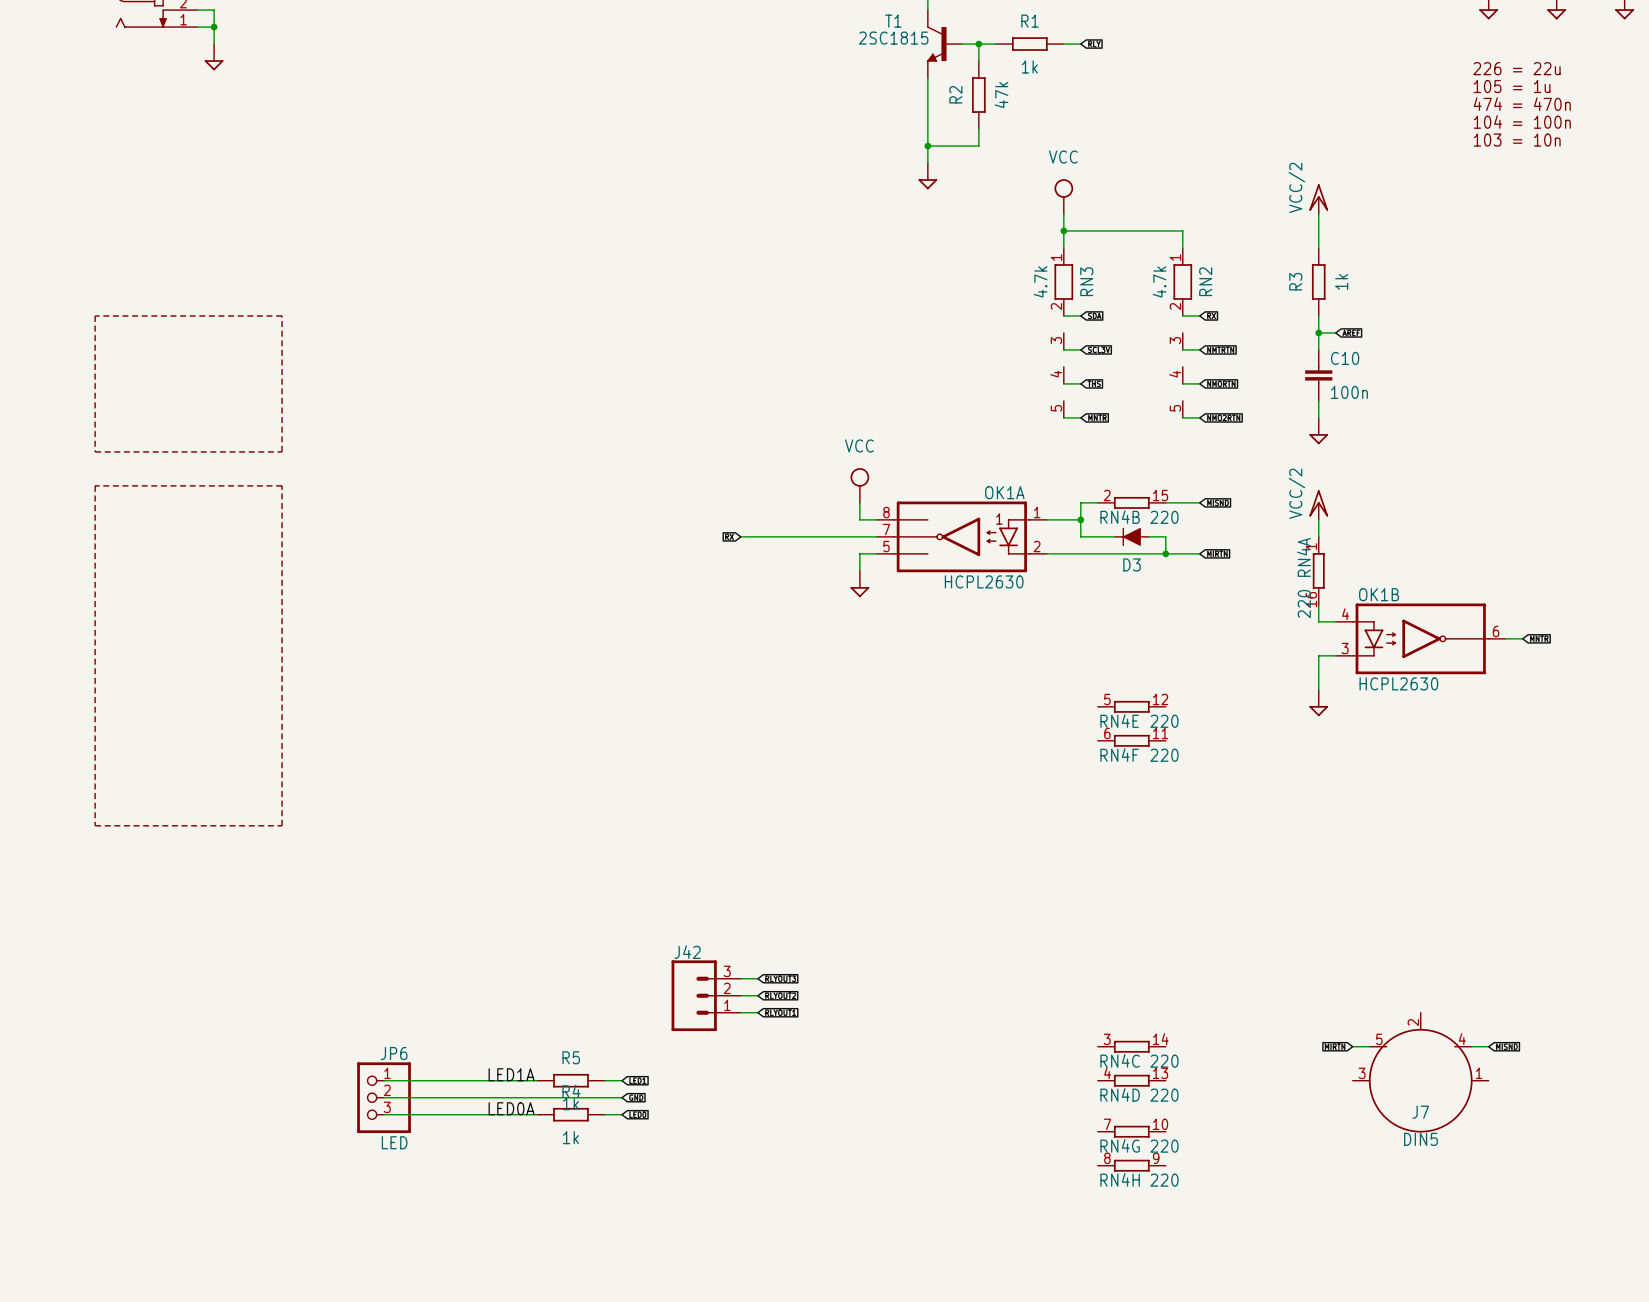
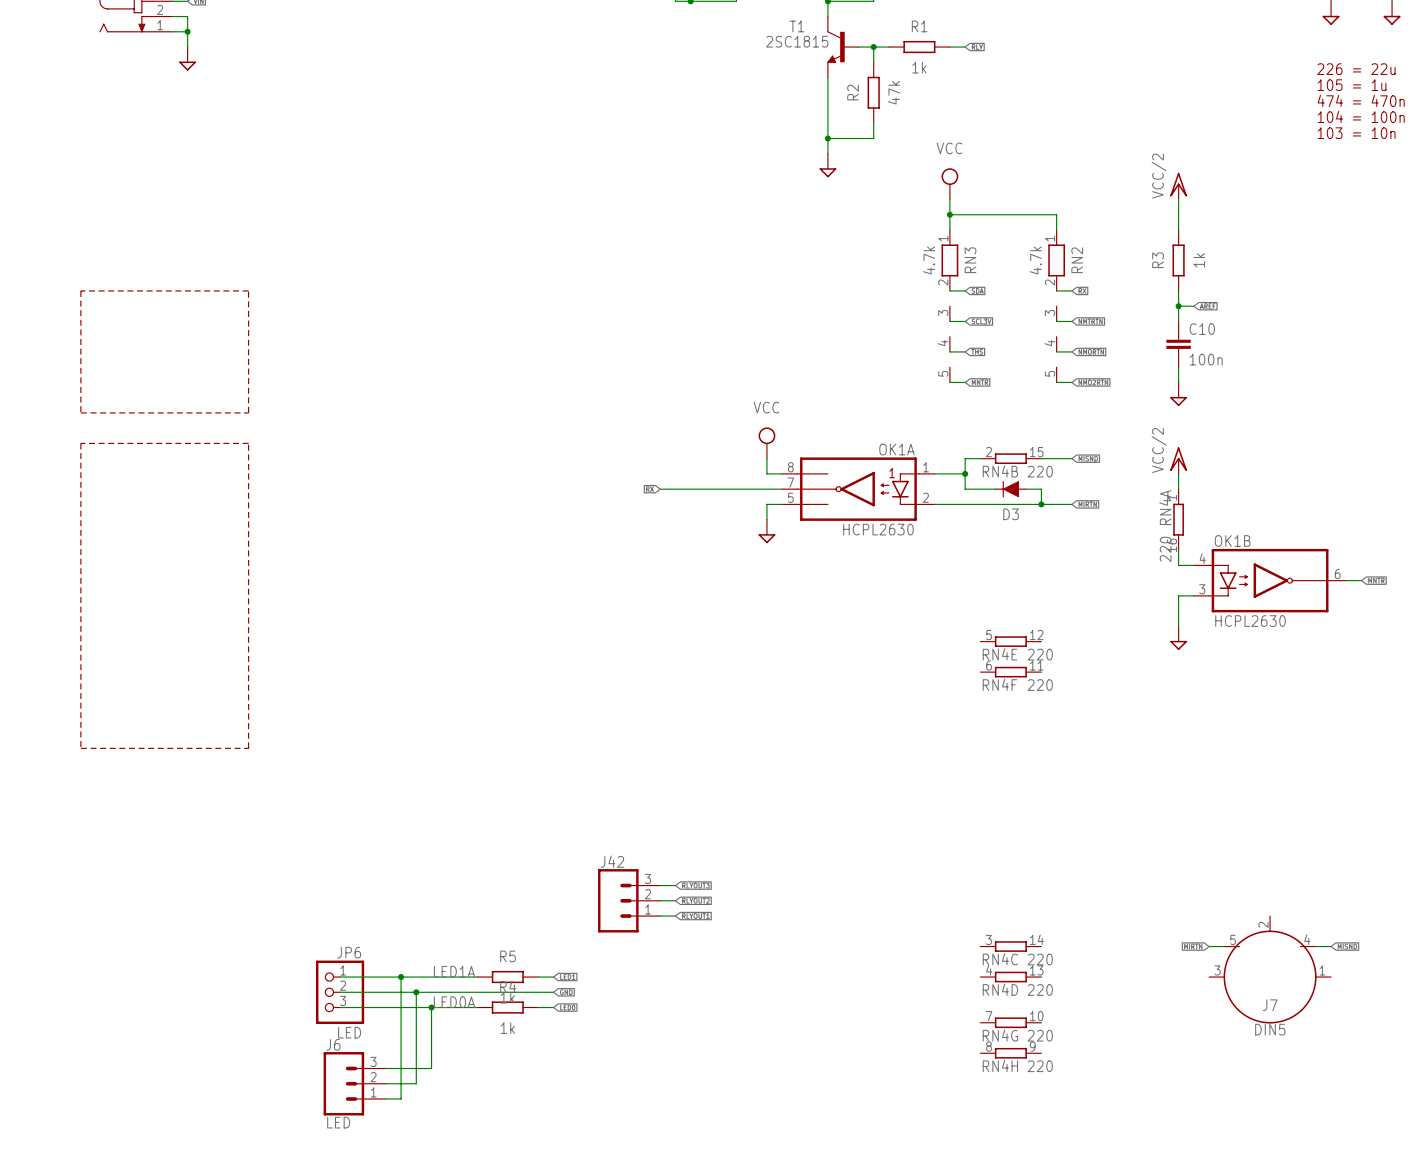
wire: none -> (401, 977) (401, 1099) (385, 1099)
junction: none -> (401, 977)
wire: none -> (416, 992) (416, 1083) (385, 1083)
junction: none -> (416, 992)
wire: none -> (431, 1007) (431, 1068) (385, 1068)
junction: none -> (431, 1007)
J6: none -> LED (354, 1083)

